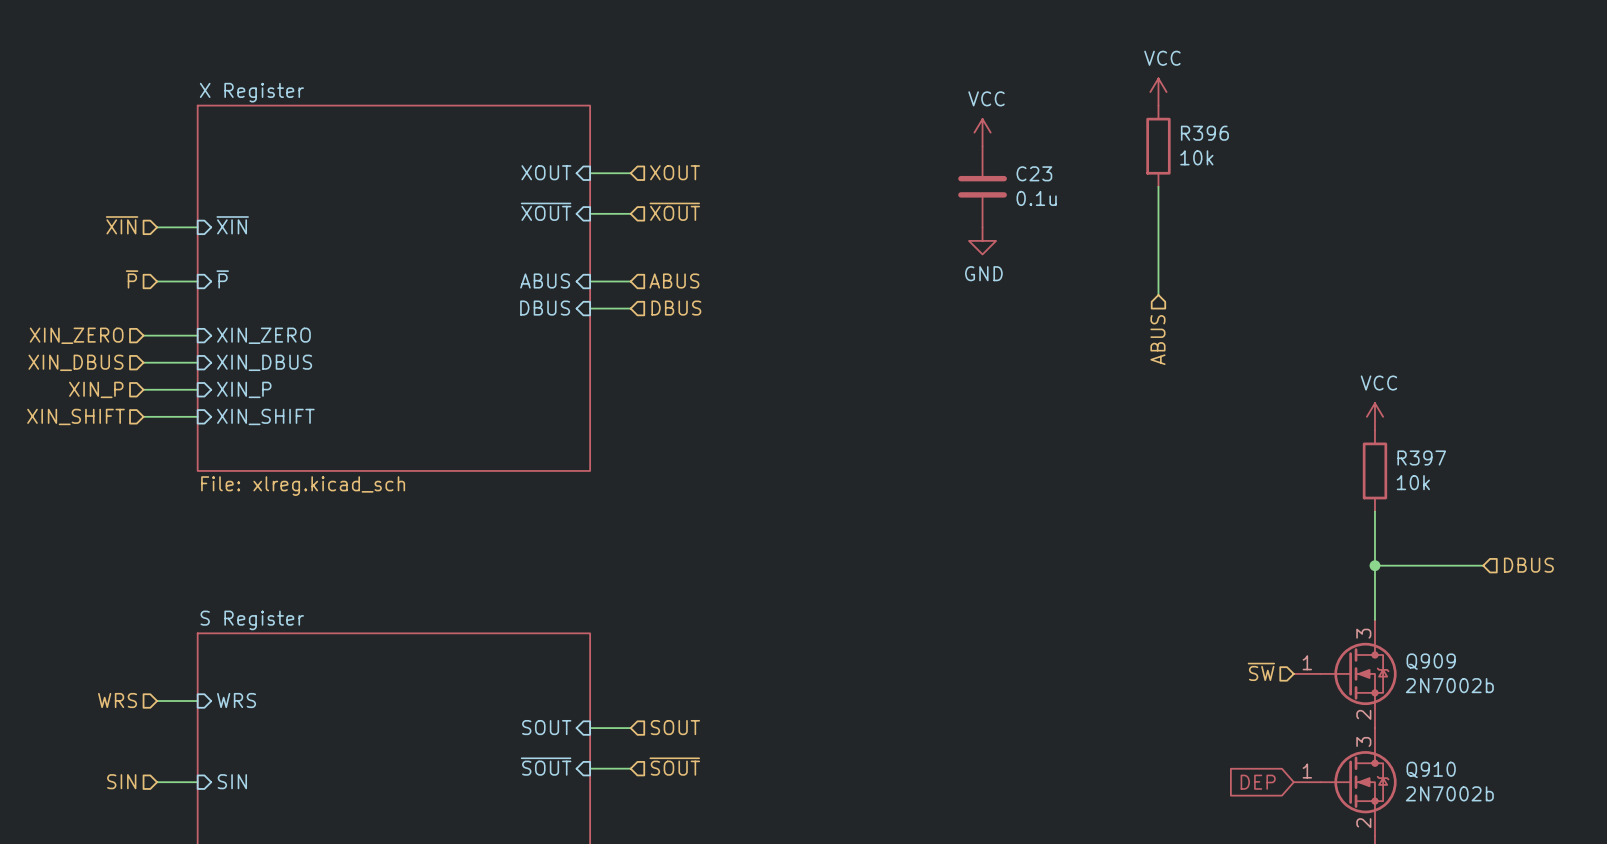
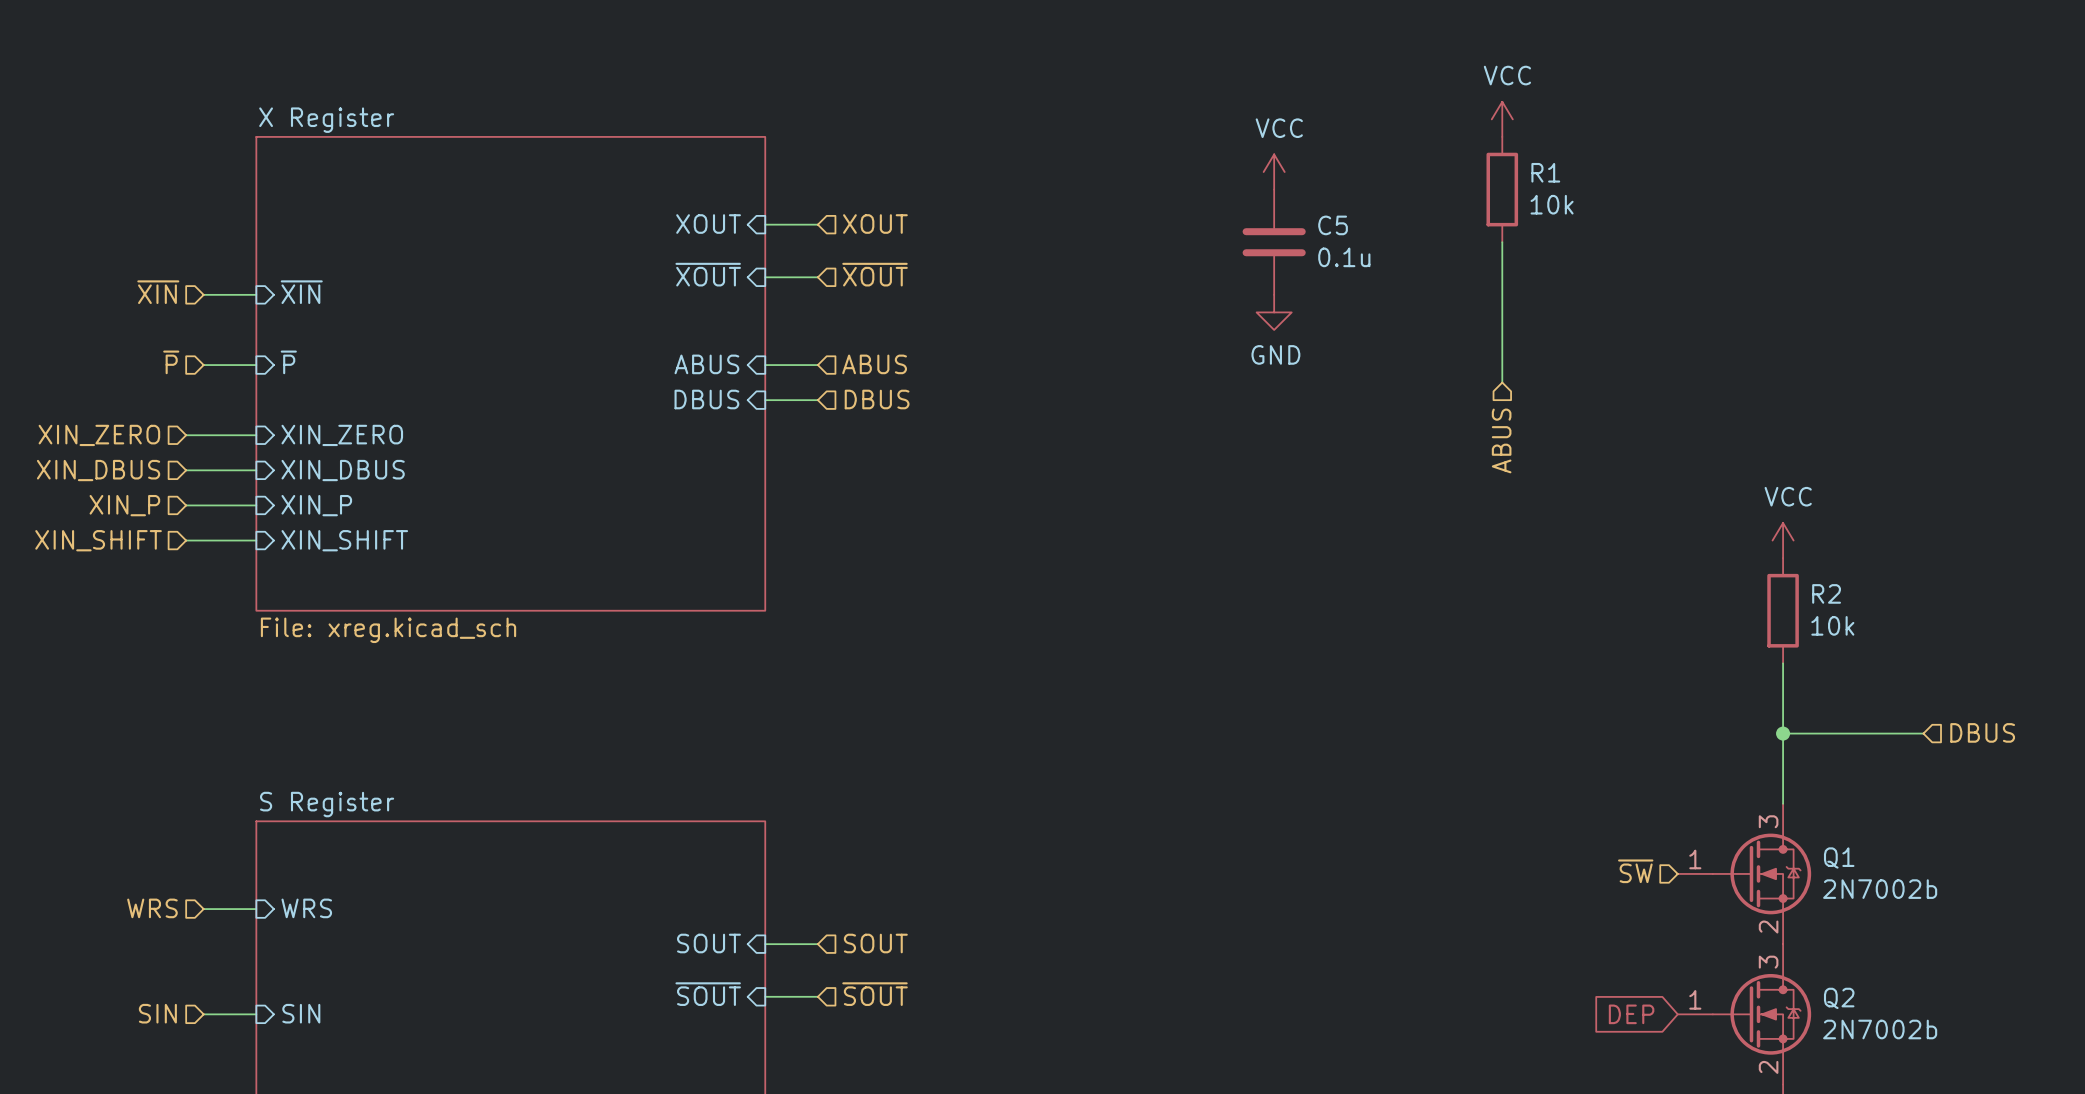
R396 name: R396 (1204, 133) -> R1 (1545, 172)
C23 name: C23 (1034, 173) -> C5 (1333, 225)
R397 name: R397 (1421, 458) -> R2 (1826, 593)
sheet X Register value: File: xlreg.kicad_sch (303, 486) -> File: xreg.kicad_sch (388, 630)
Q909 name: Q909 (1431, 661) -> Q1 (1839, 858)
Q910 name: Q910 (1431, 769) -> Q2 (1839, 998)

